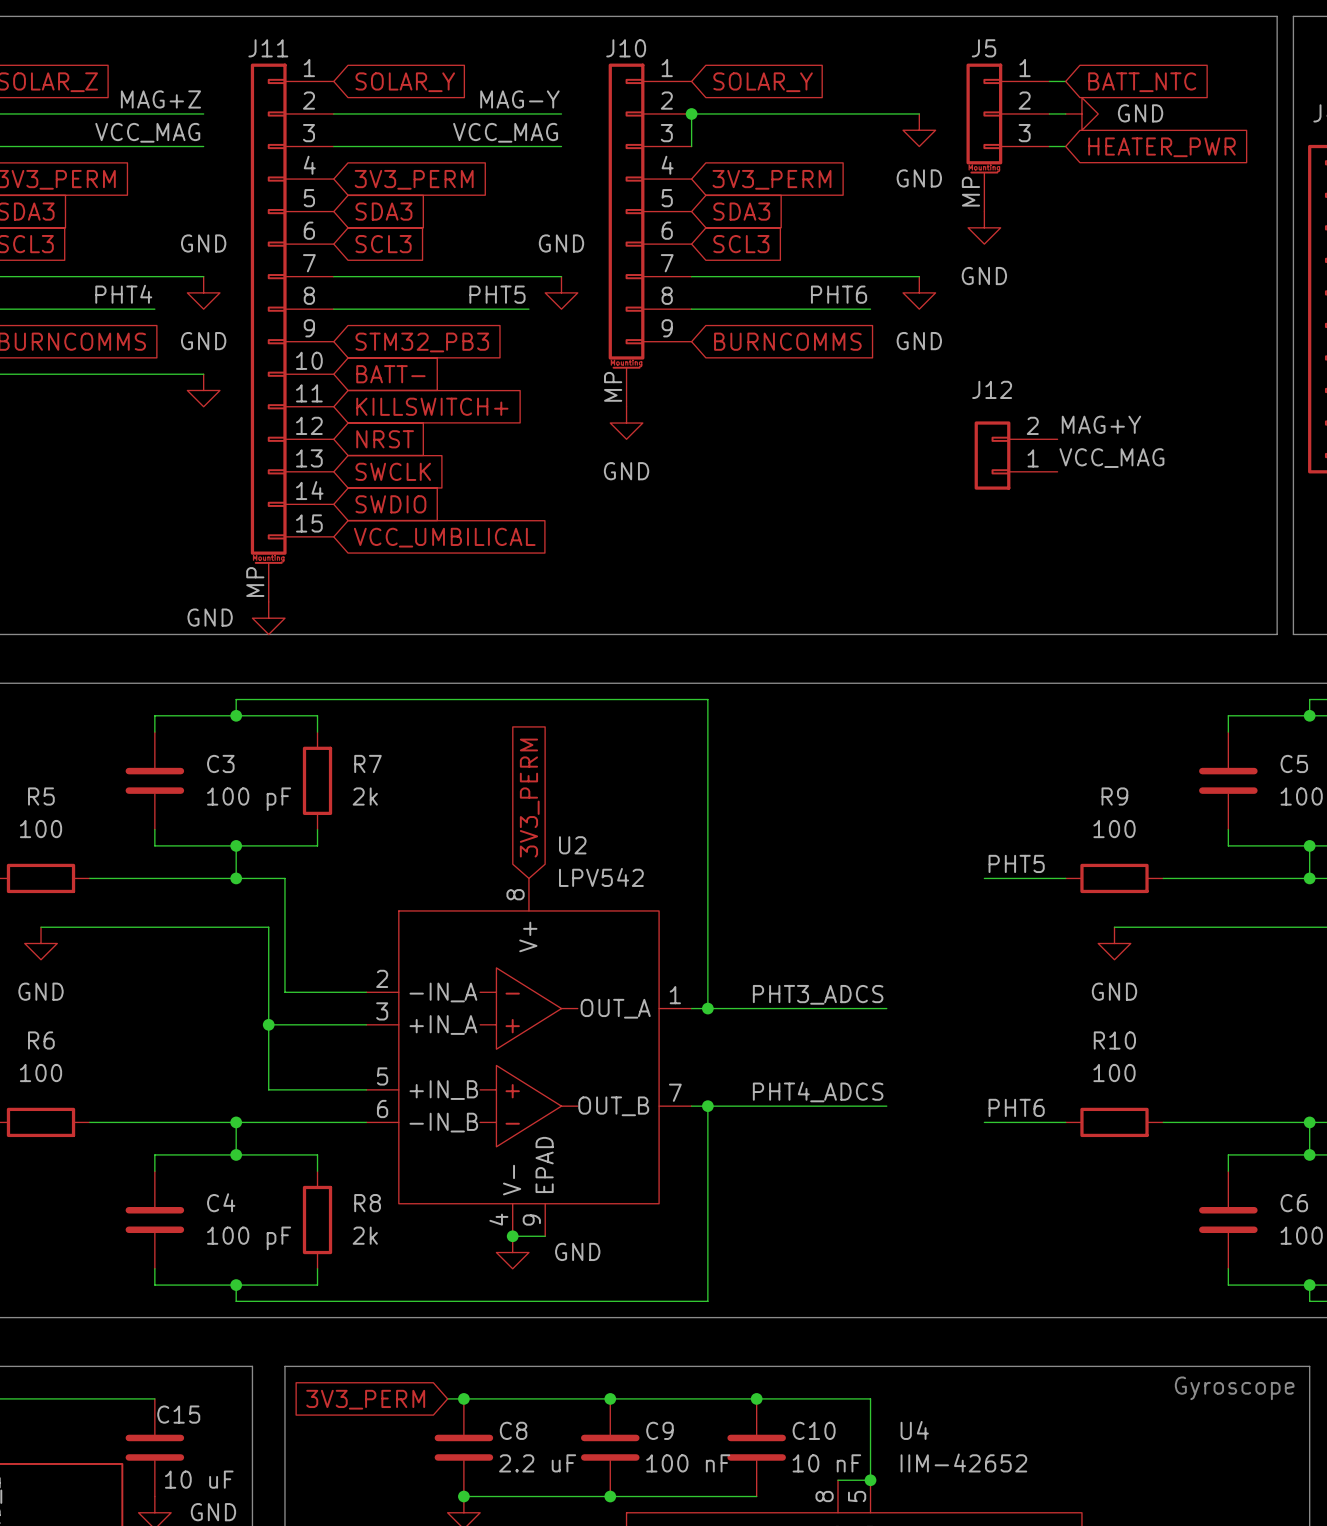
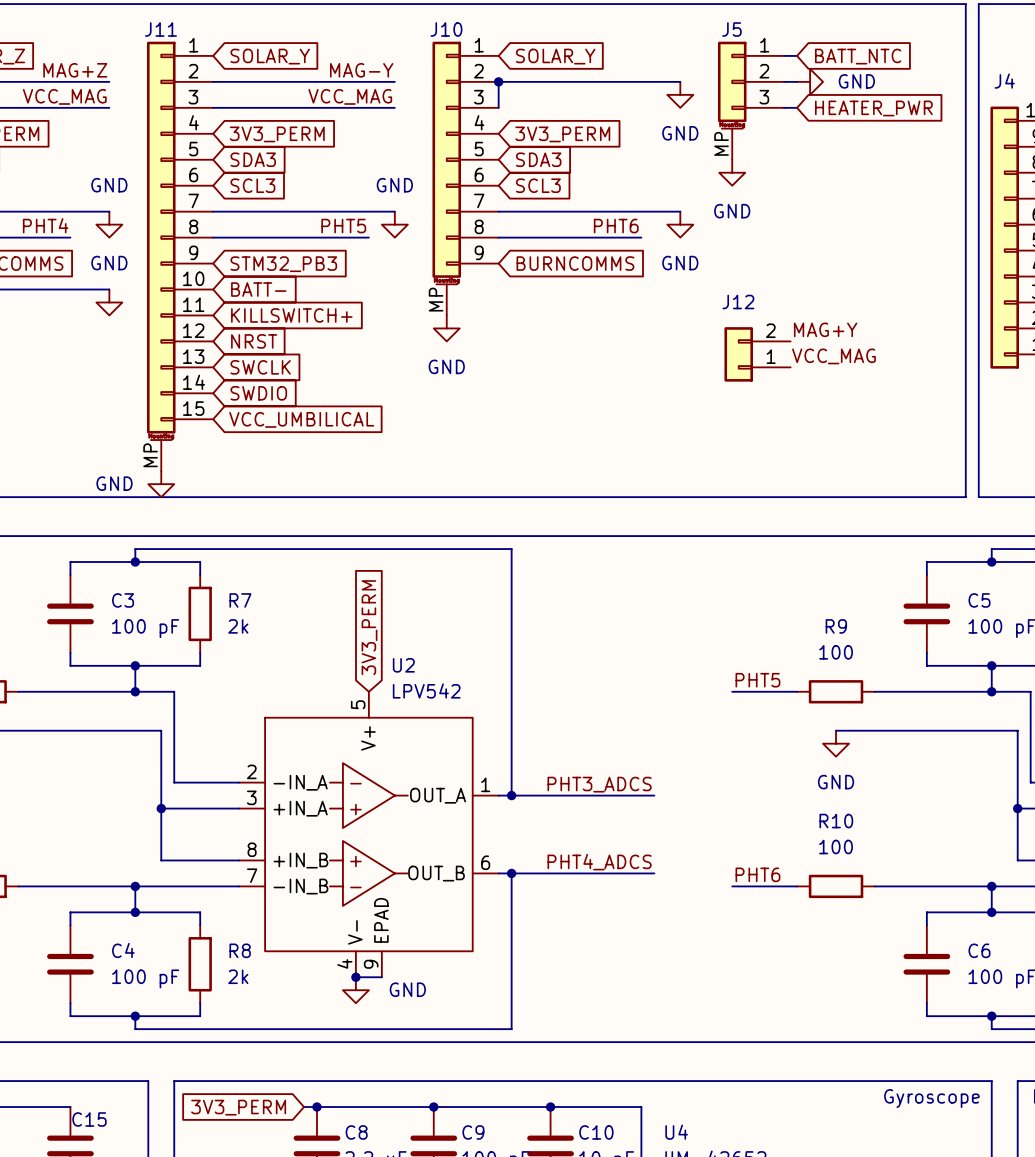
U2 pin number: 8 (515, 894) -> 5 (358, 704)
U2 pin number: 5 (382, 1076) -> 8 (252, 849)
U2 pin number: 7 (675, 1092) -> 6 (485, 862)
U2 pin number: 6 (382, 1109) -> 7 (252, 875)

